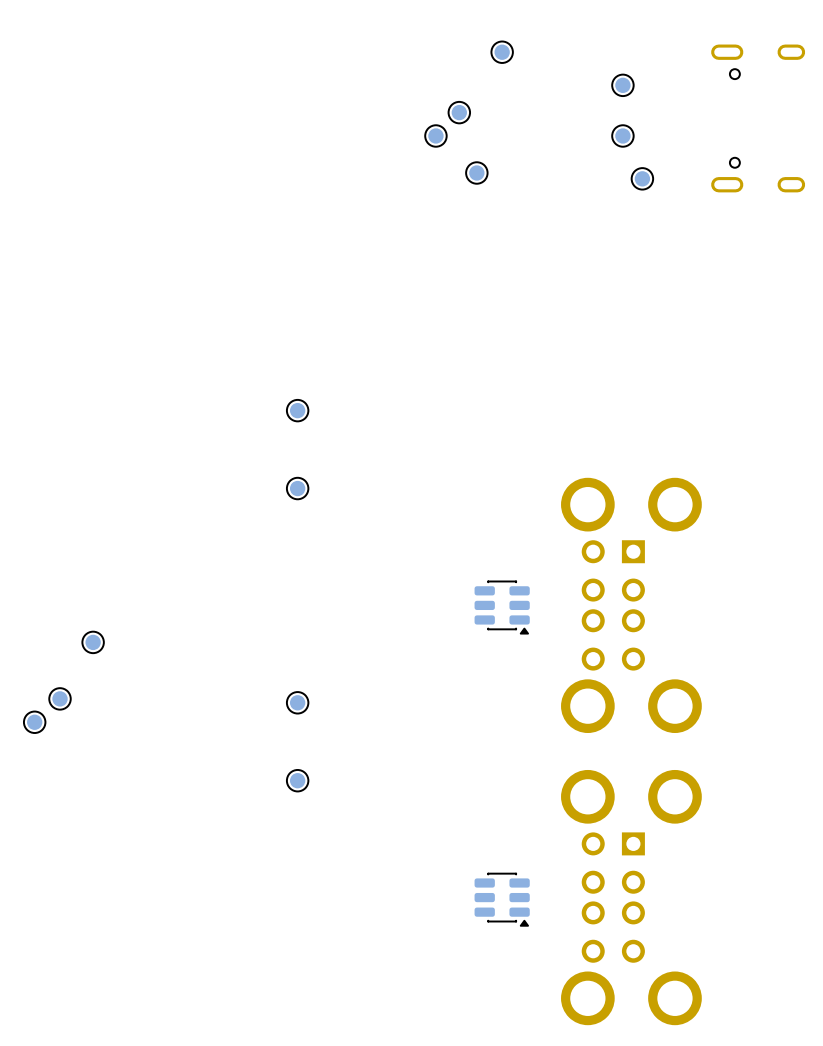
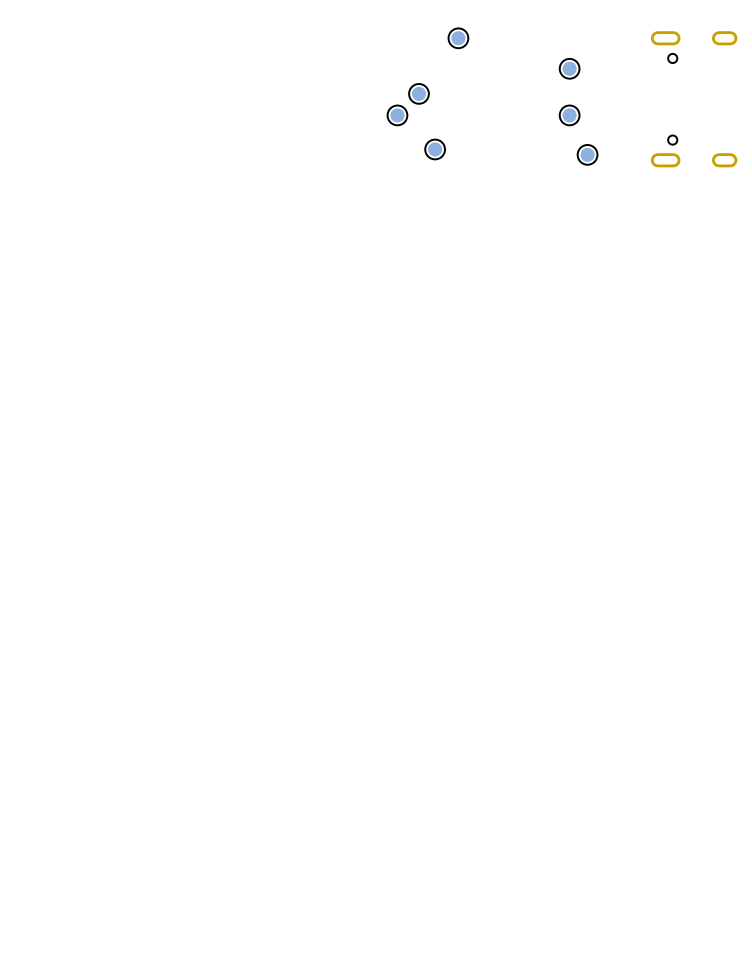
part: (297, 410) -> none
part: (297, 488) -> none
part: (631, 605) -> none
part: (502, 607) -> none
part: (93, 642) -> none
part: (60, 698) -> none
part: (297, 702) -> none
part: (34, 722) -> none
part: (297, 780) -> none
part: (631, 897) -> none
part: (502, 899) -> none

